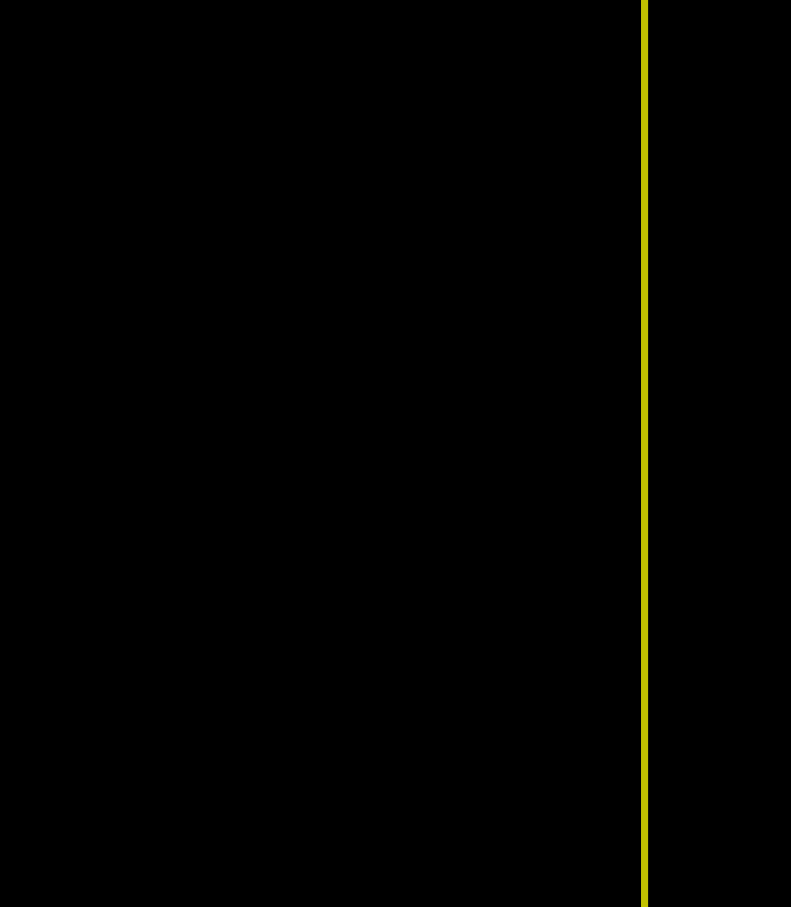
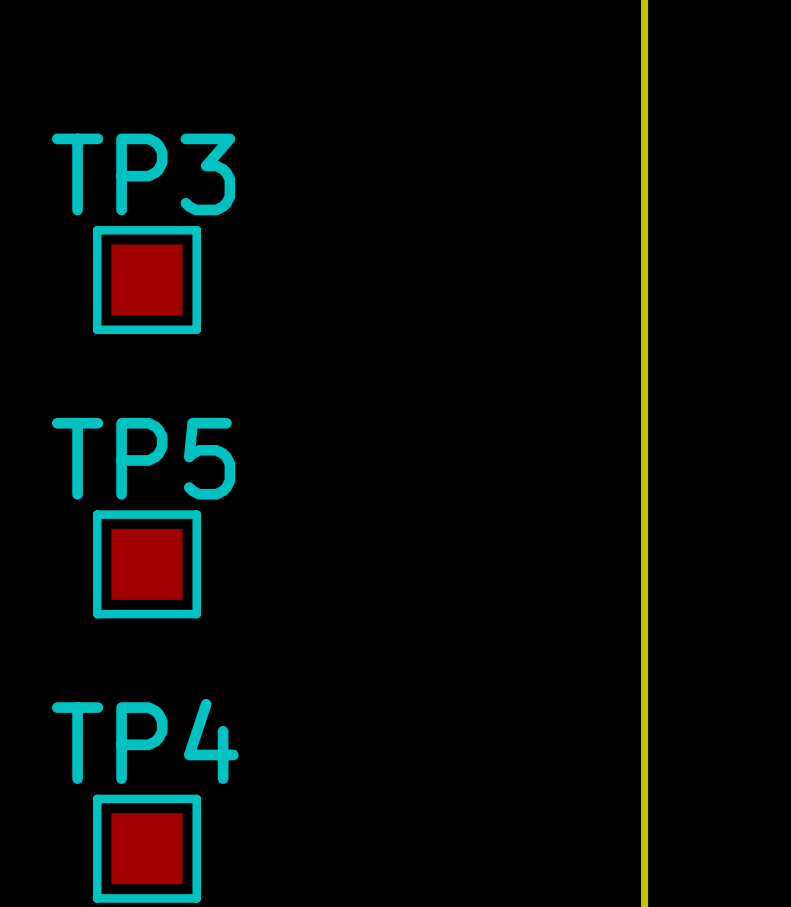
TP3: none -> (146, 280)
TP5: none -> (146, 564)
TP4: none -> (146, 848)

